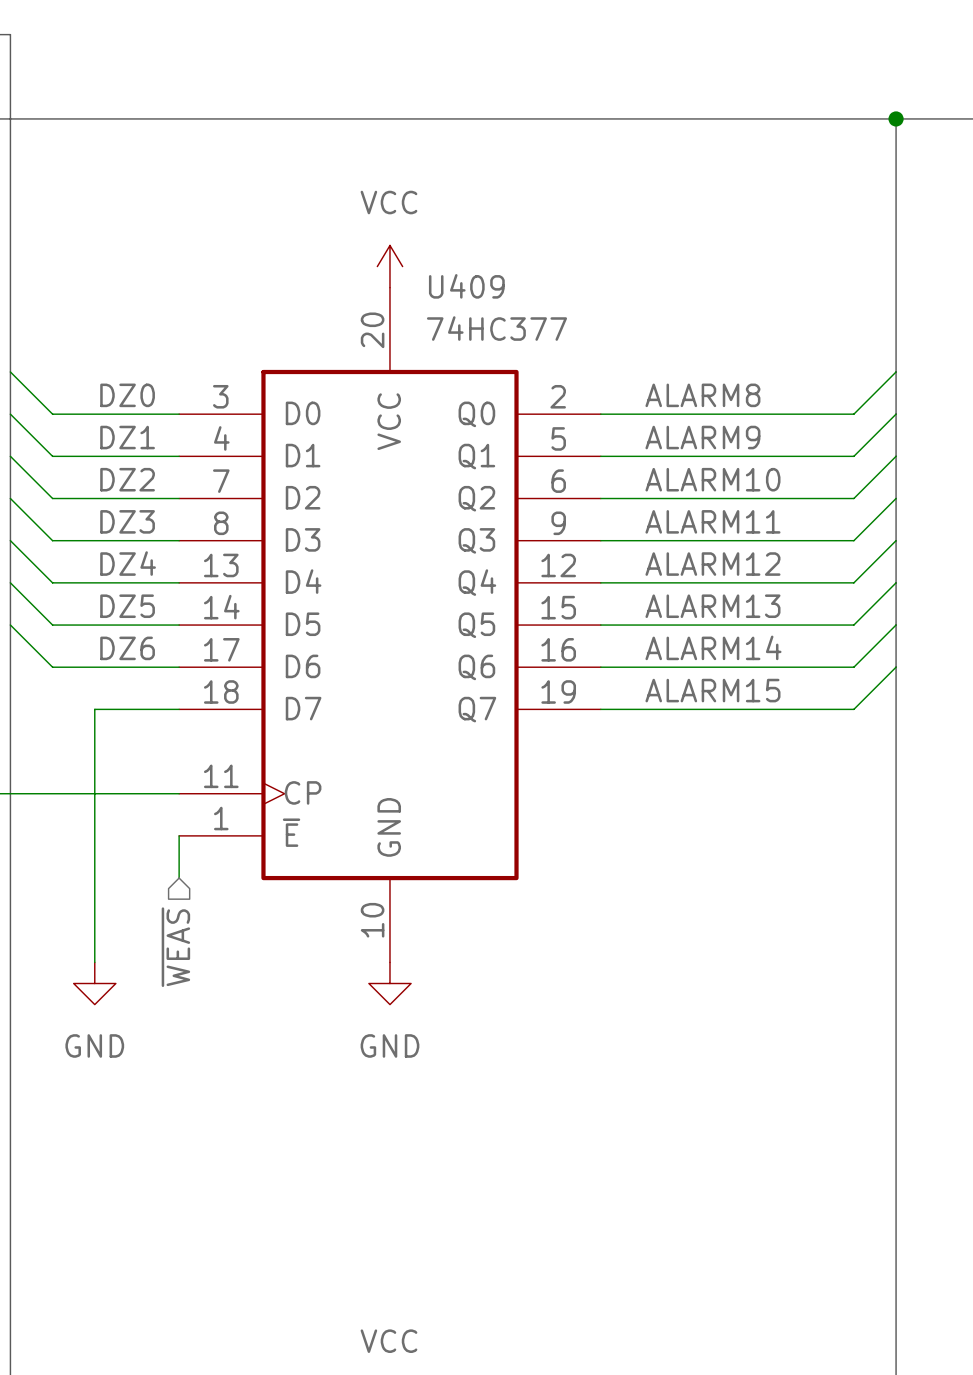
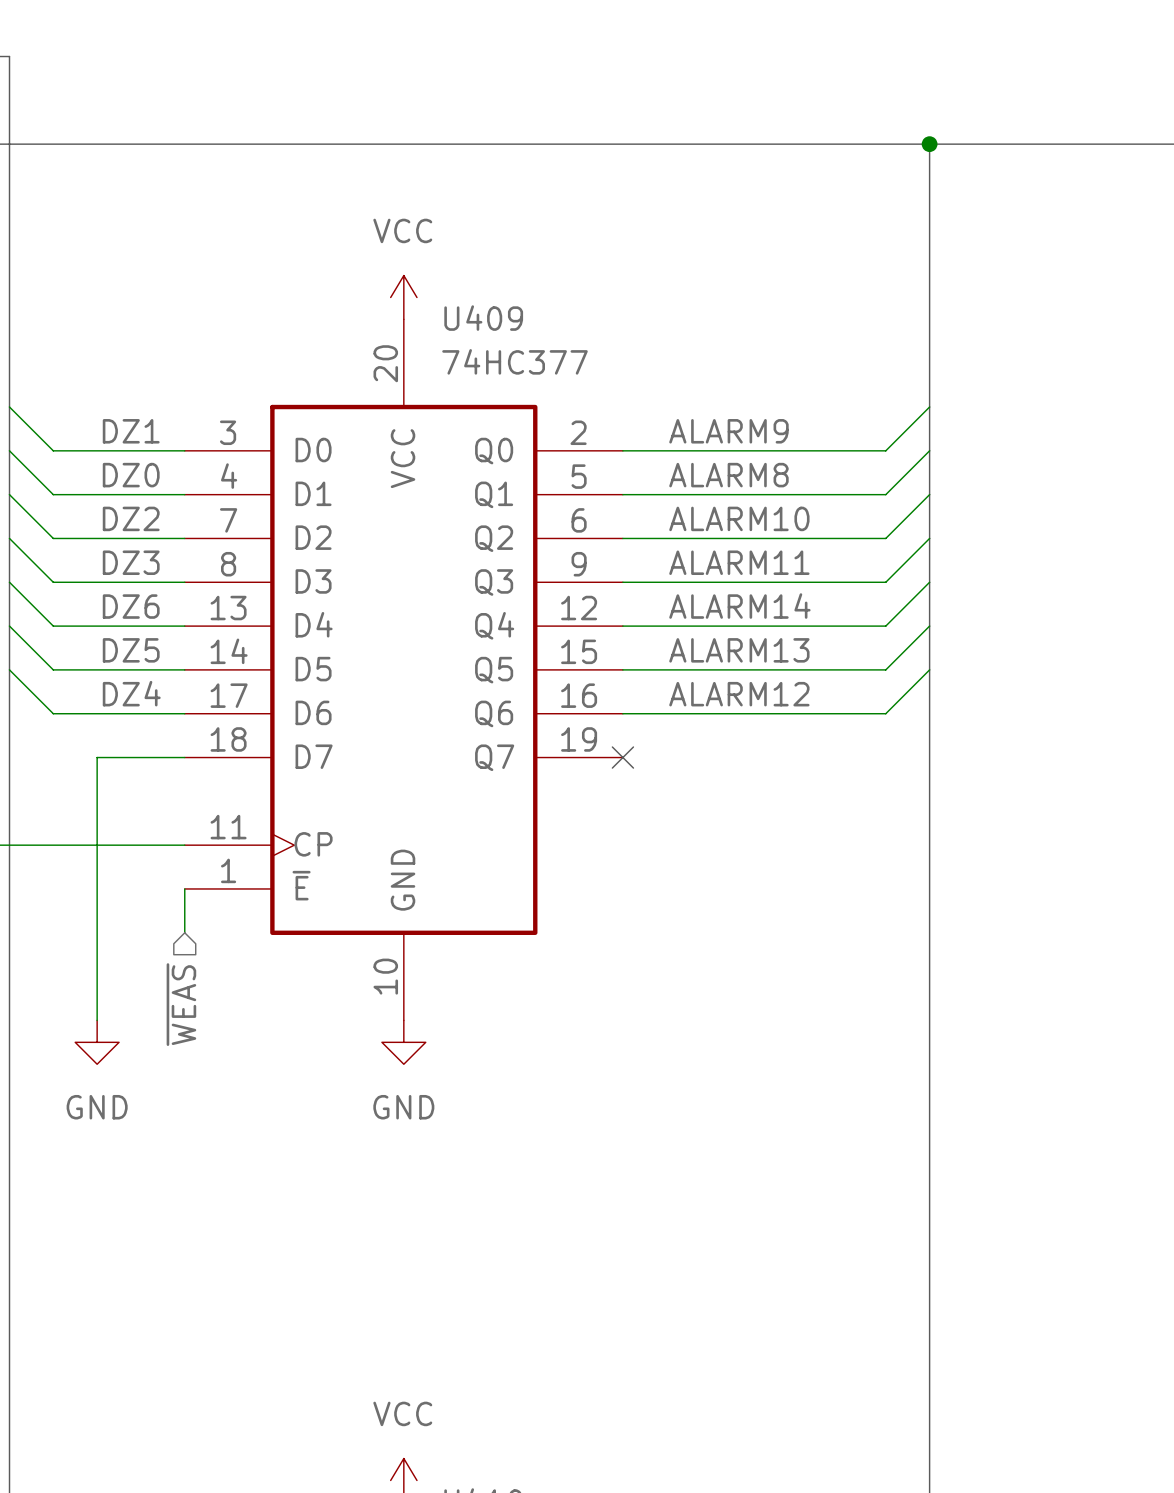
label: DZ0 (127, 395) -> DZ1 (131, 431)
label: ALARM8 (702, 395) -> ALARM9 (728, 431)
label: DZ1 (127, 437) -> DZ0 (131, 475)
label: ALARM9 (702, 437) -> ALARM8 (728, 475)
label: DZ4 (128, 563) -> DZ6 (131, 606)
label: ALARM12 (712, 564) -> ALARM14 (739, 606)
label: ALARM14 (713, 647) -> ALARM12 (739, 694)
label: DZ6 (127, 648) -> DZ4 (131, 693)
wire: (896, 667) (853, 709) (600, 709) -> none
label: ALARM15 (712, 690) -> none
no-connect mark: none -> (622, 757)

